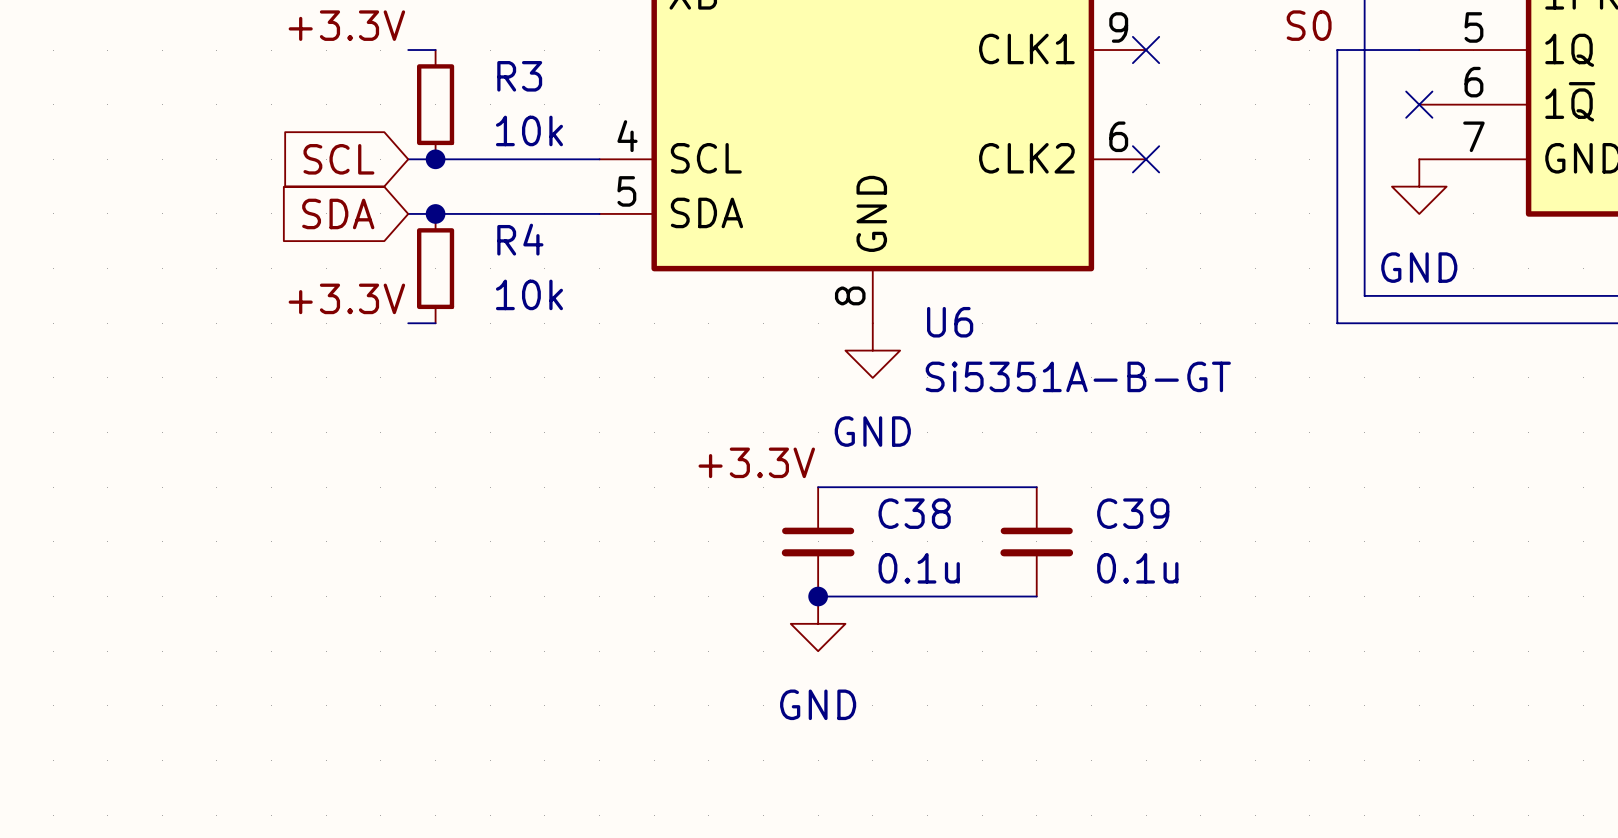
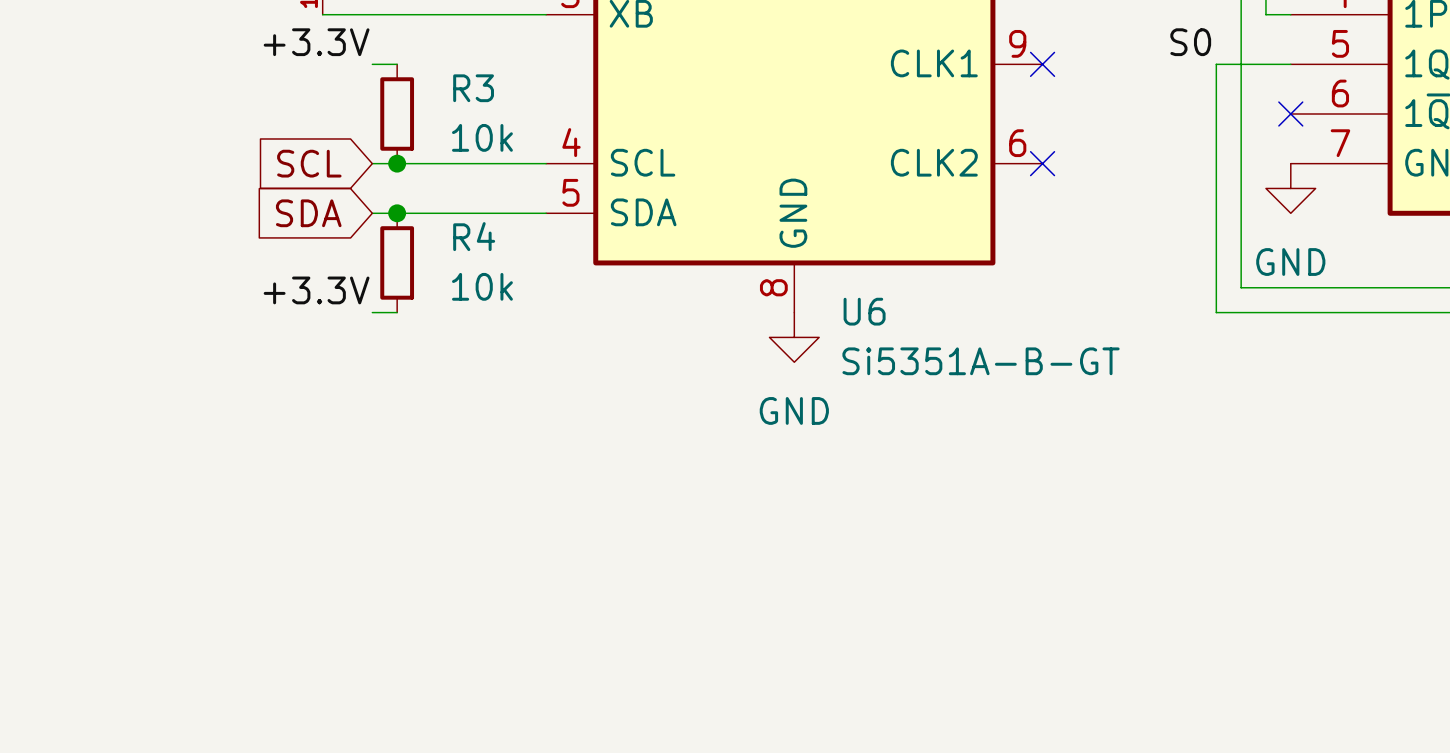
label: +3.3V (756, 462) -> none
wire: (818, 487) (1036, 487) -> none
C38: 0.1u (818, 541) -> none
C39: 0.1u (1036, 541) -> none
wire: (818, 596) (1036, 596) -> none
junction: (818, 596) -> none
power symbol: GND (818, 623) -> none

